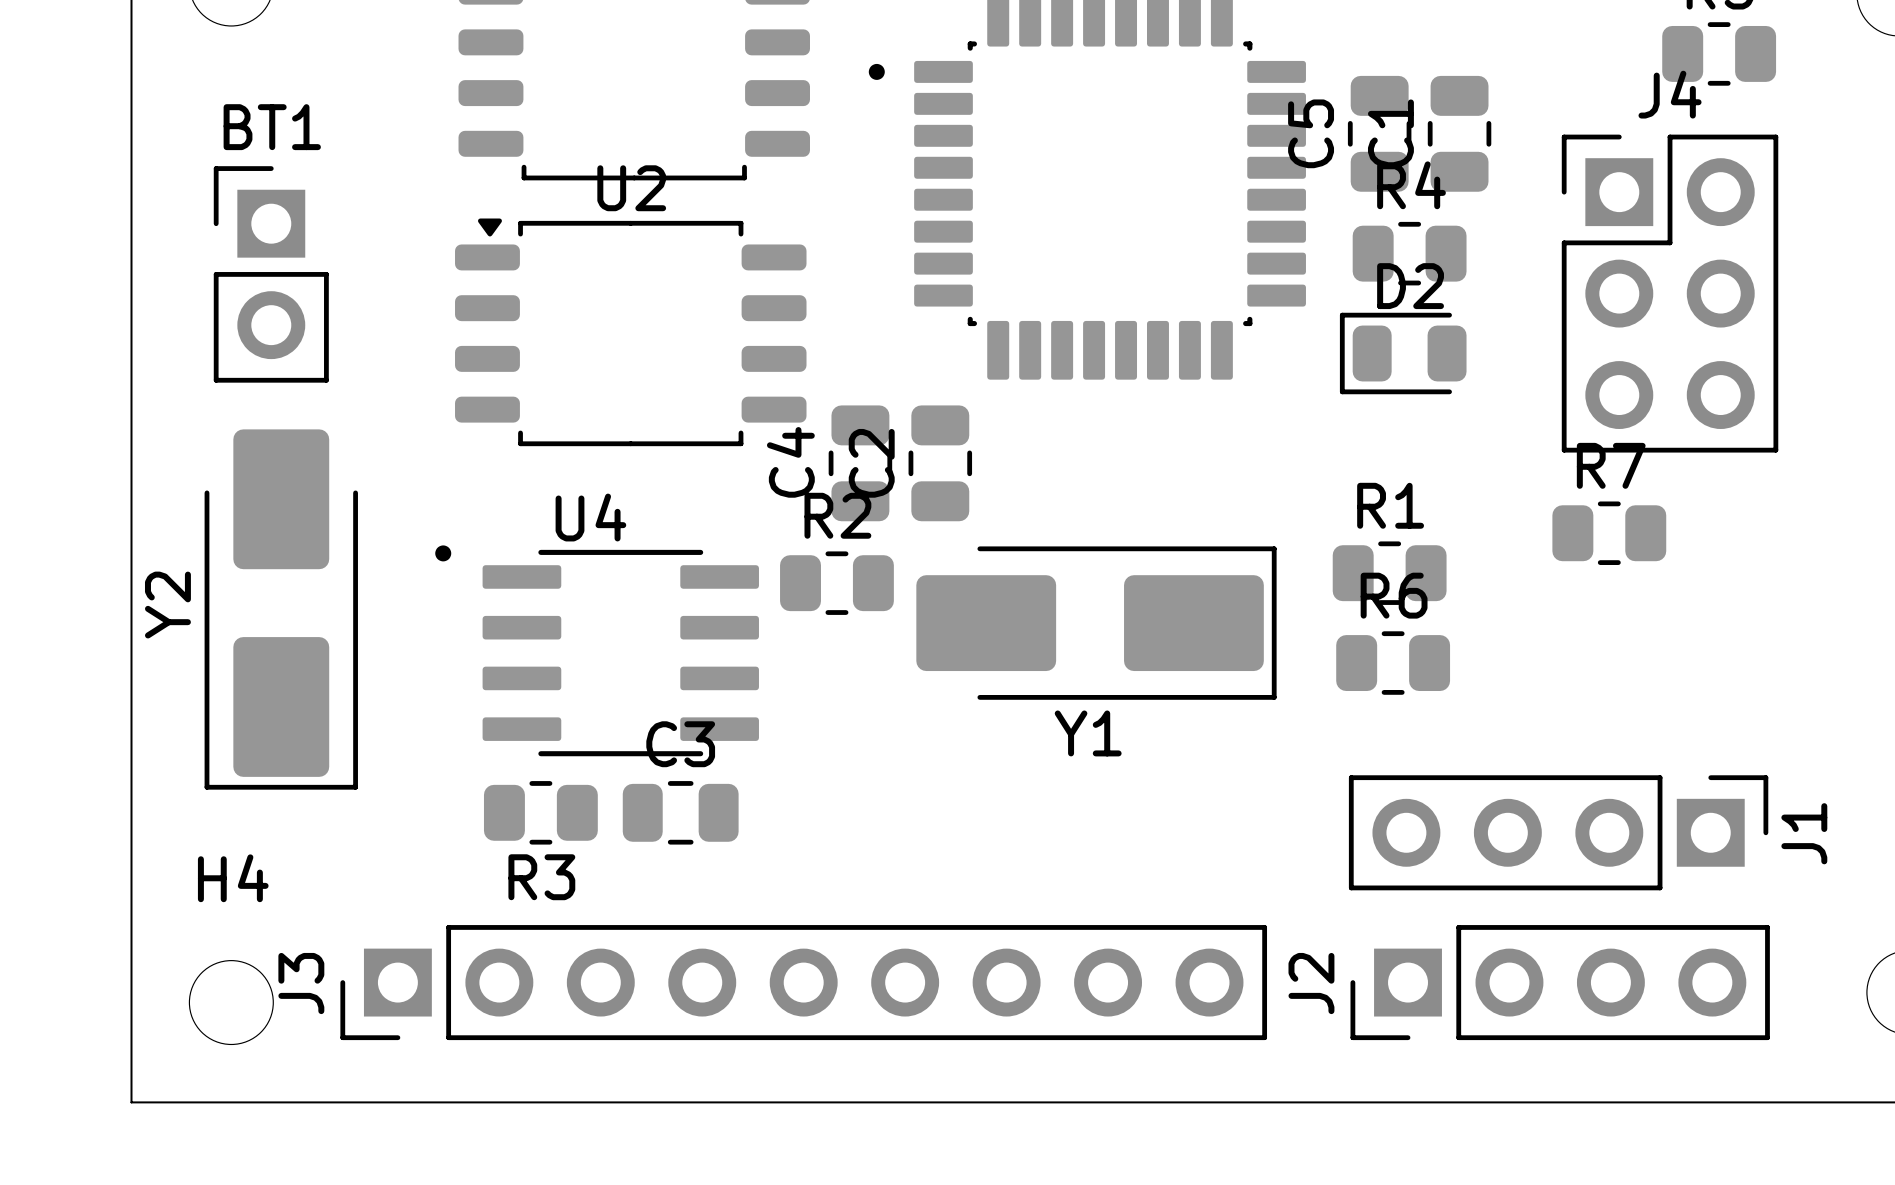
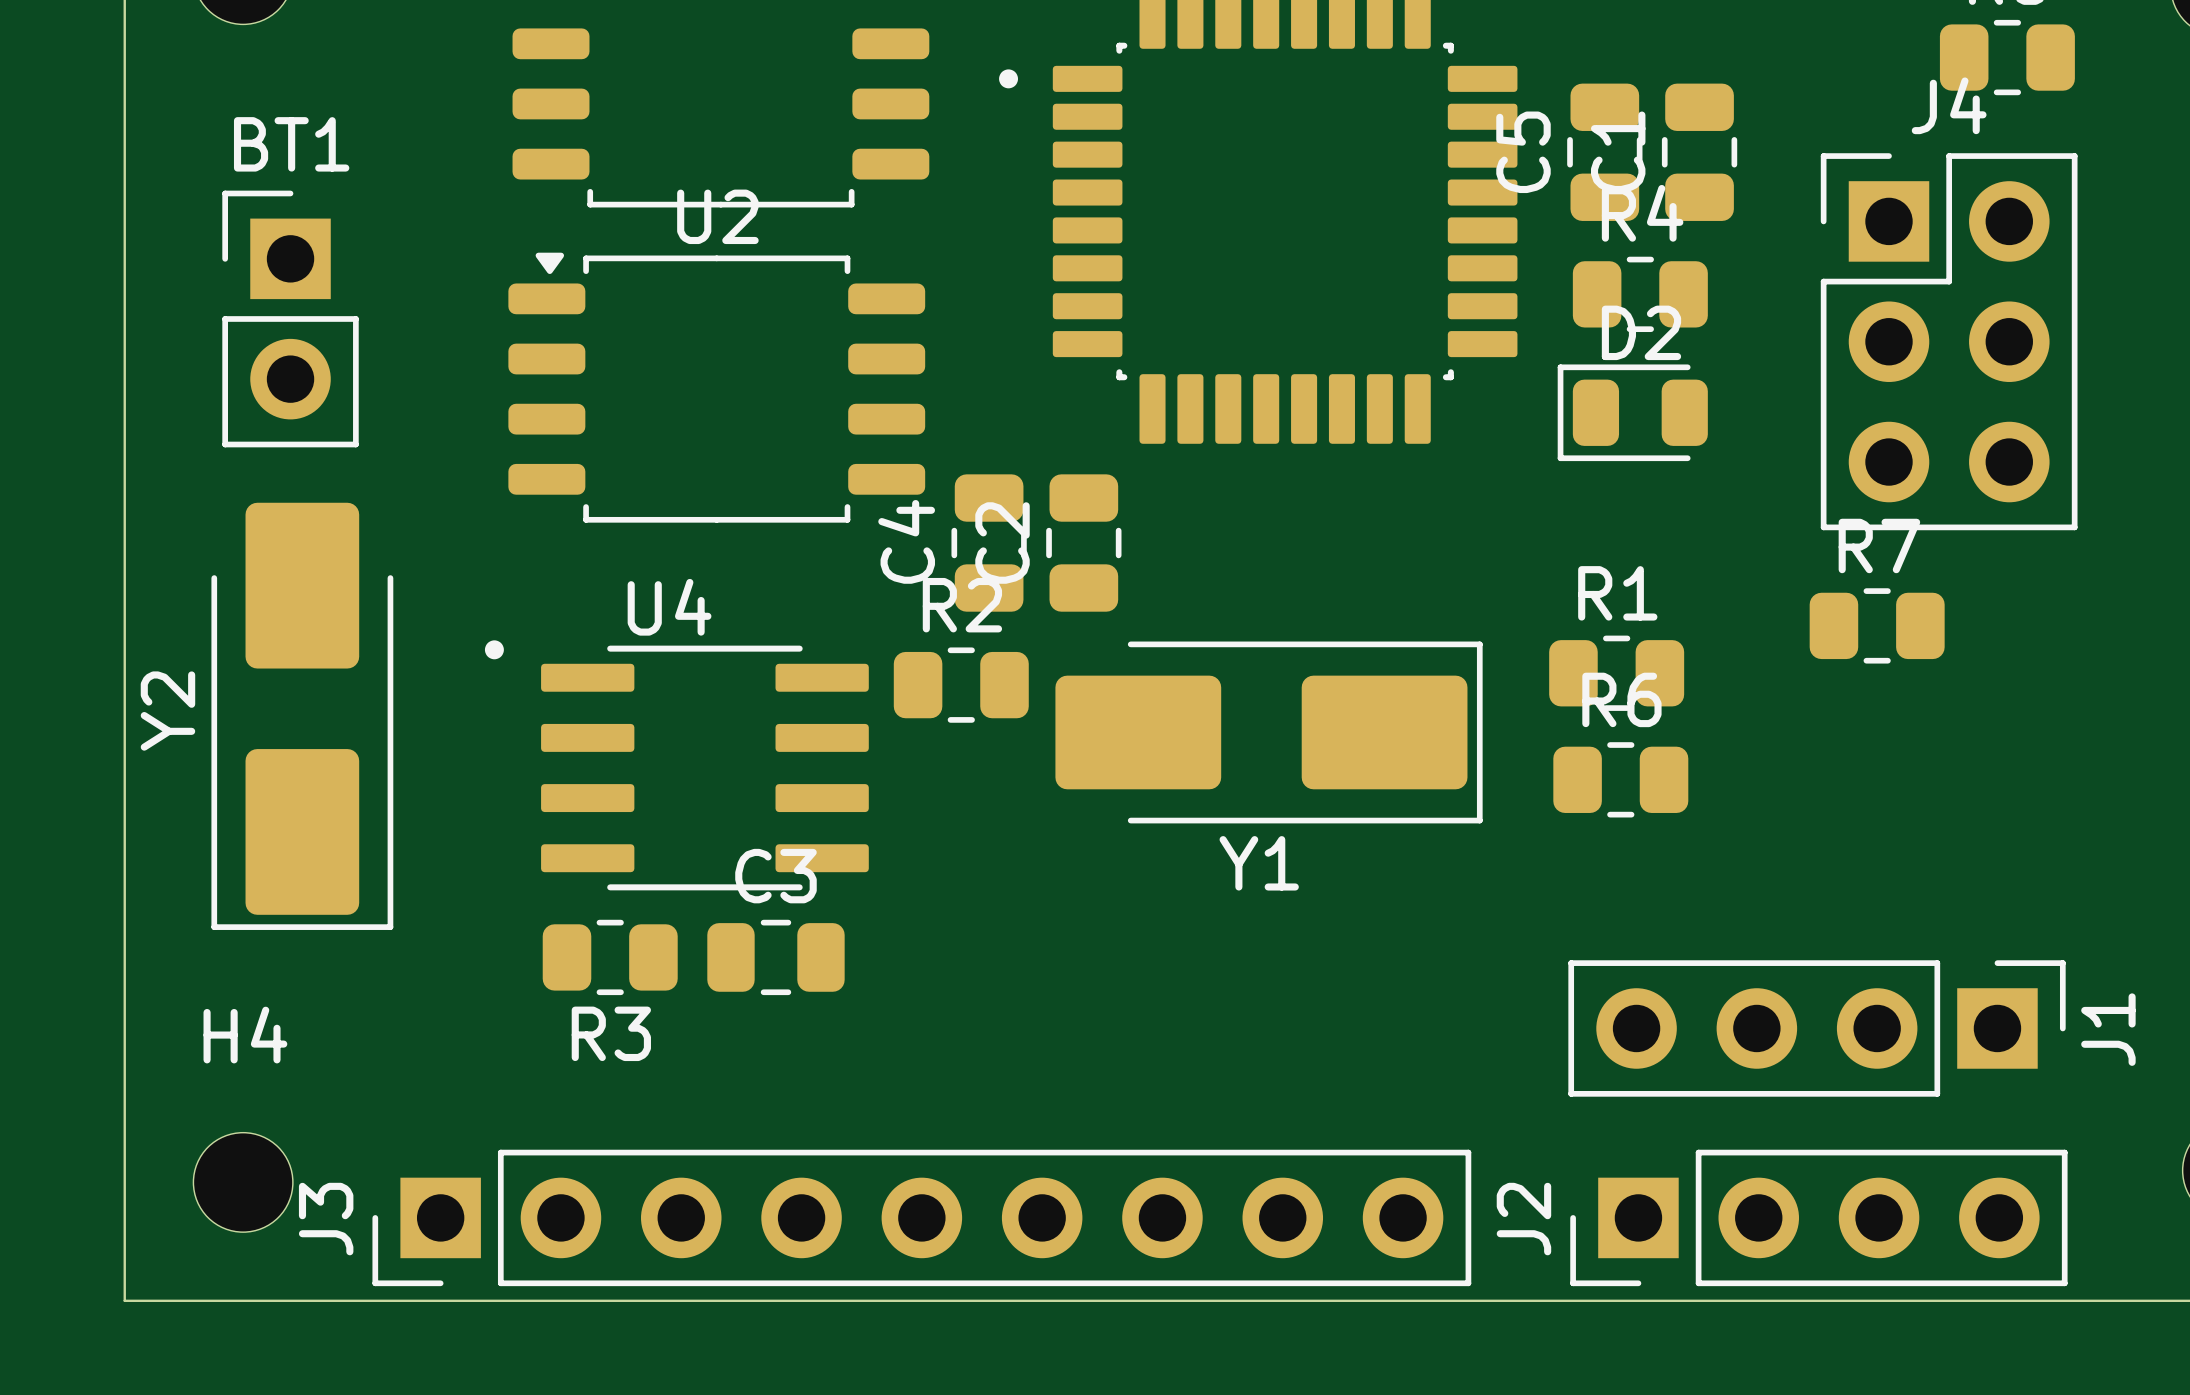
J1 position: (1558, 832) -> (1817, 1028)
J3 position: (803, 982) -> (921, 1217)
J2 position: (1560, 982) -> (1818, 1217)

